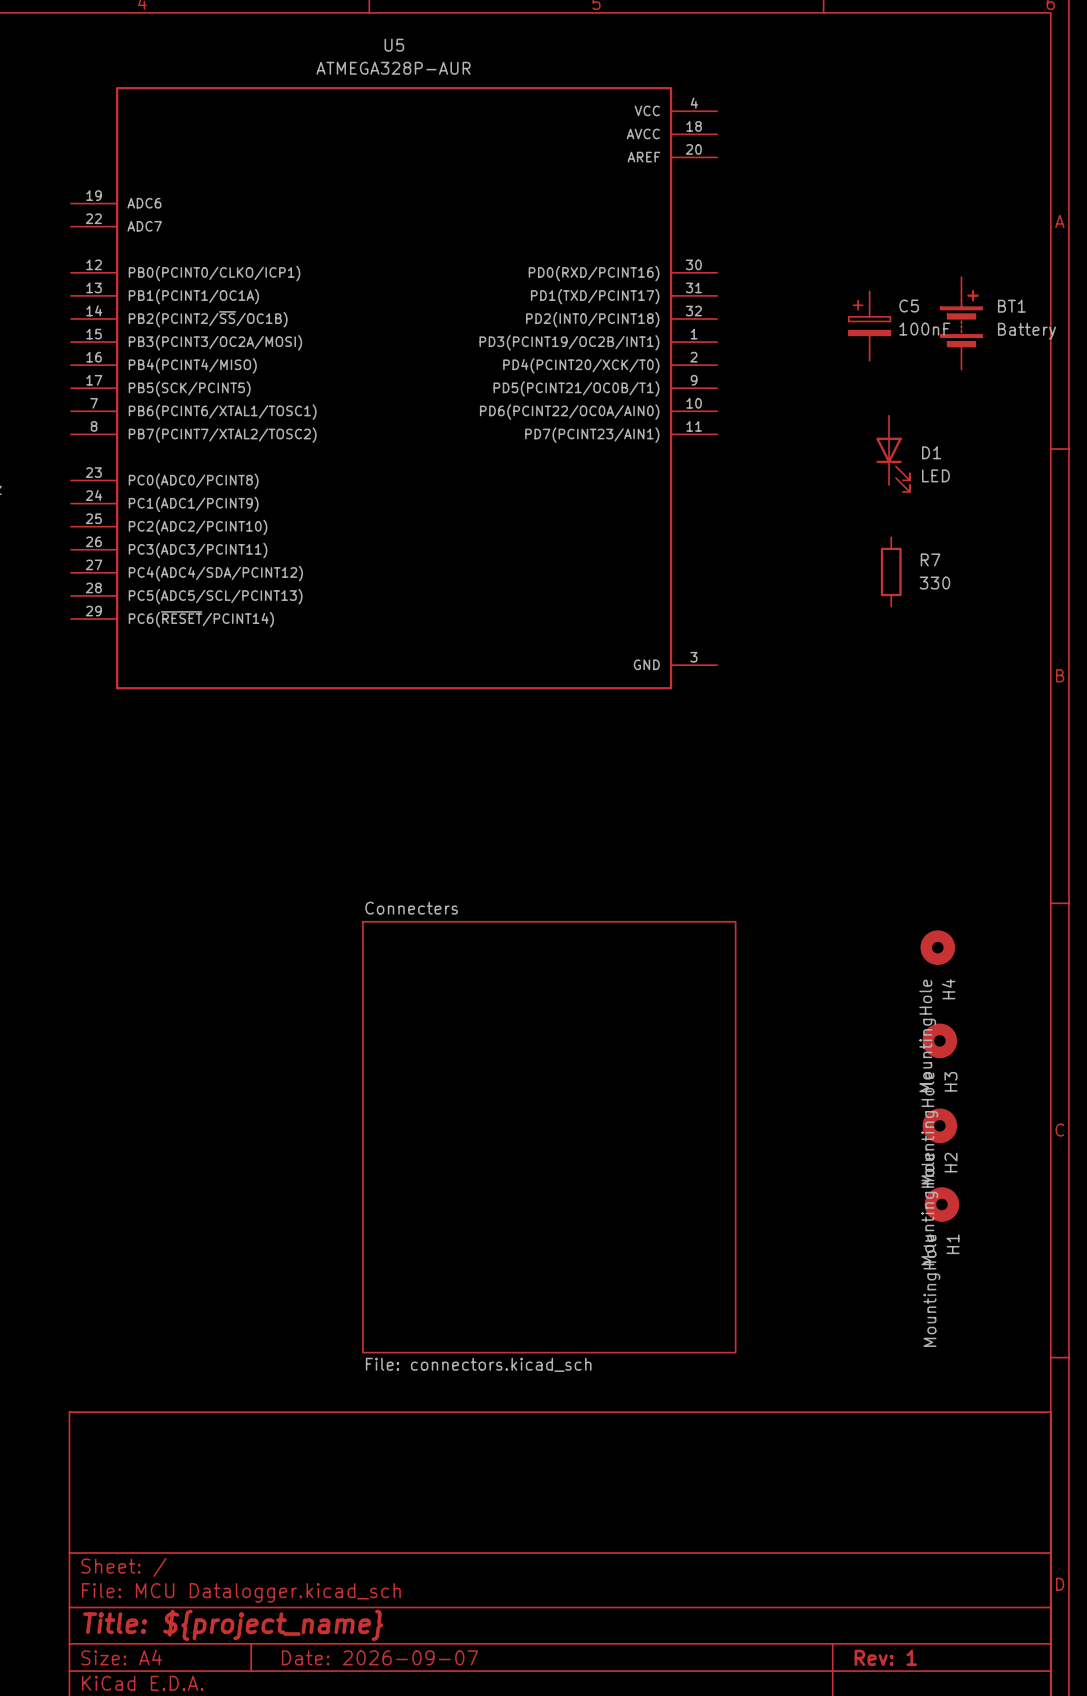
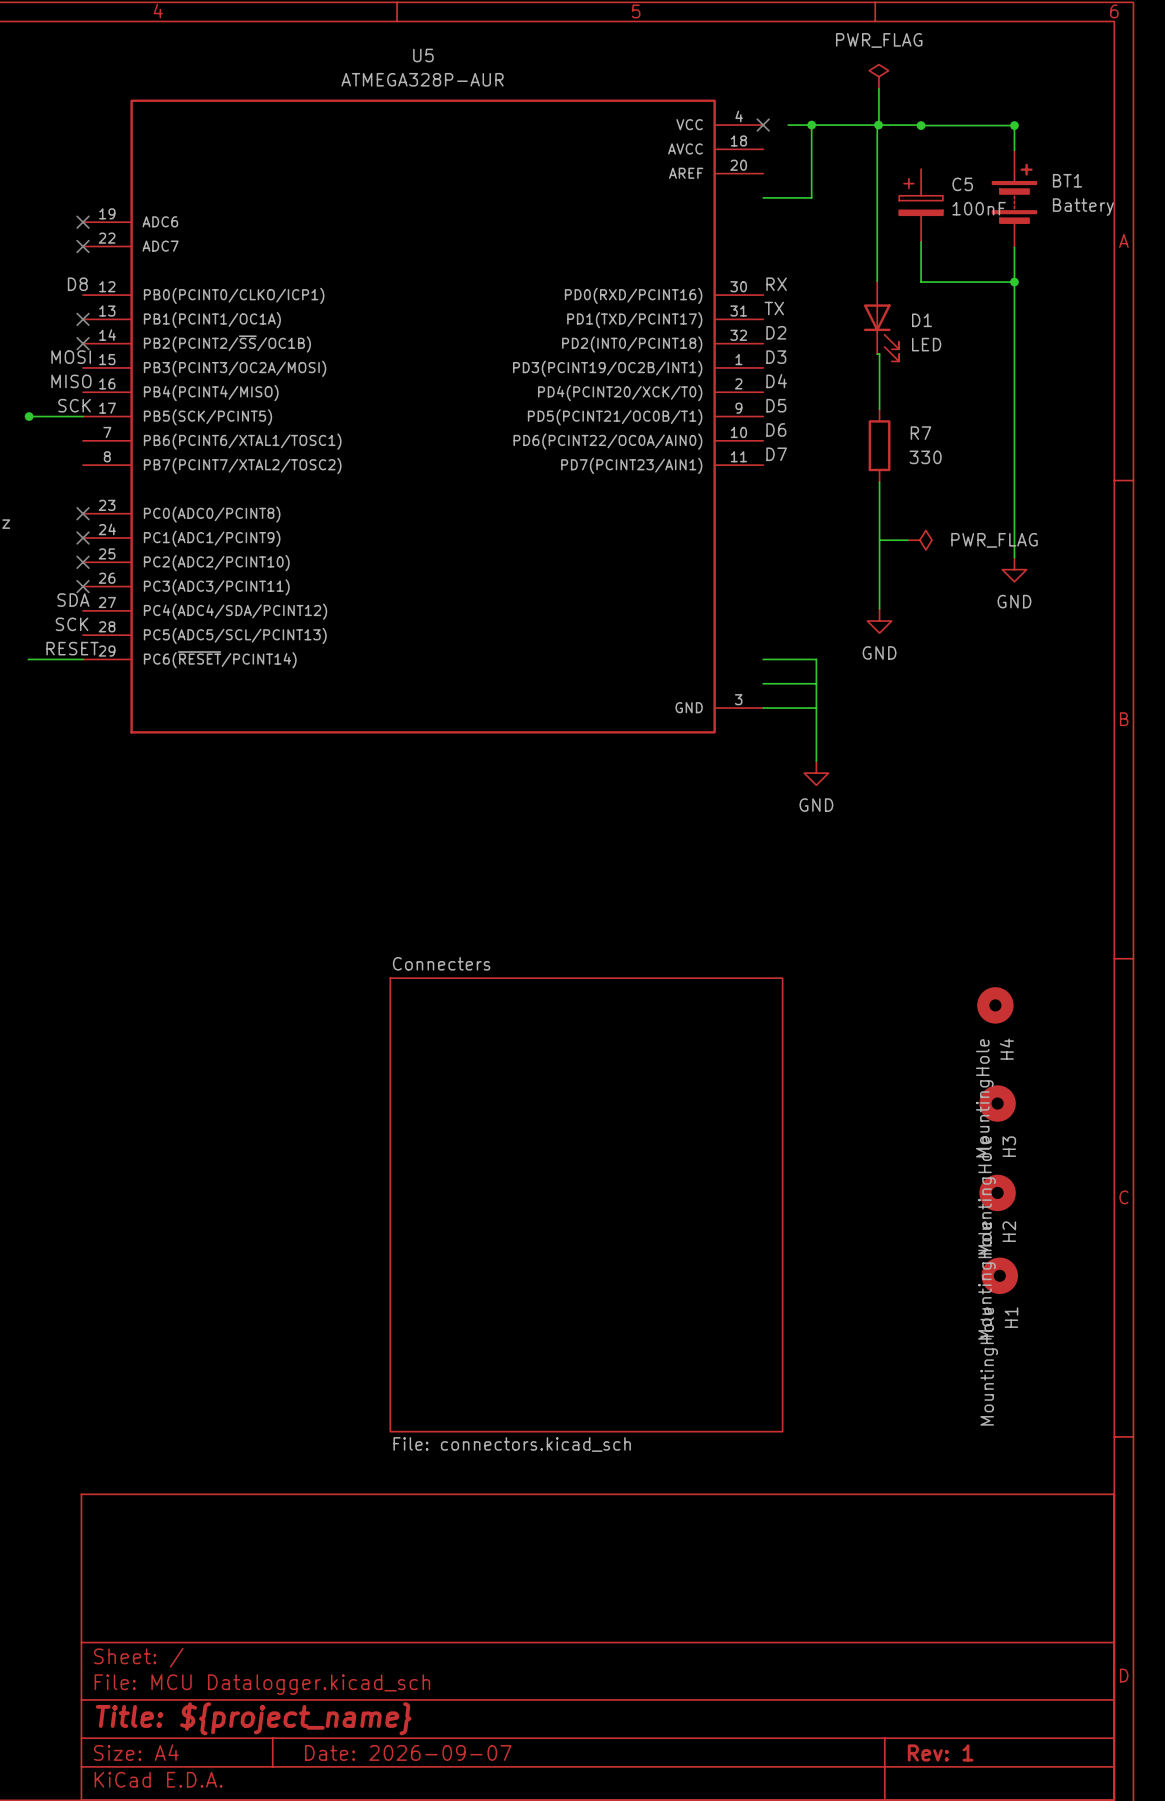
power symbol: none -> PWR_FLAG (878, 76)
wire: none -> (878, 88) (878, 125)
no-connect mark: none -> (763, 125)
wire: none -> (788, 125) (921, 125)
wire: none -> (811, 125) (811, 197) (763, 197)
junction: none -> (811, 125)
wire: none -> (877, 125) (877, 281)
junction: none -> (878, 125)
wire: none -> (921, 125) (1014, 125)
junction: none -> (921, 125)
wire: none -> (1014, 125) (1014, 150)
junction: none -> (1014, 125)
no-connect mark: none -> (83, 222)
wire: none -> (921, 241) (921, 282) (1014, 282)
no-connect mark: none -> (83, 246)
wire: none -> (1014, 247) (1014, 557)
junction: none -> (1014, 282)
label: none -> D8 (77, 284)
label: none -> RX (776, 284)
label: none -> TX (774, 308)
no-connect mark: none -> (83, 319)
label: none -> D2 (776, 332)
no-connect mark: none -> (83, 343)
BT1 position: (961, 323) -> (1014, 198)
C5 position: (869, 326) -> (921, 205)
wire: none -> (877, 354) (879, 354) (879, 409)
label: none -> MOSI (71, 357)
label: none -> D3 (776, 357)
label: none -> MISO (71, 381)
label: none -> D4 (776, 381)
label: none -> SCK (74, 405)
label: none -> D5 (776, 405)
wire: none -> (29, 416) (83, 416)
junction: none -> (29, 416)
label: none -> D6 (776, 429)
label: none -> D7 (776, 454)
wire: none -> (879, 482) (879, 608)
D1 position: (893, 453) -> (881, 321)
no-connect mark: none -> (83, 513)
no-connect mark: none -> (83, 538)
wire: none -> (879, 540) (907, 540)
power symbol: none -> PWR_FLAG (919, 540)
no-connect mark: none -> (83, 562)
power symbol: none -> GND (1014, 569)
no-connect mark: none -> (83, 586)
label: none -> SDA (73, 600)
R7 position: (891, 571) -> (879, 445)
power symbol: none -> GND (879, 621)
label: none -> SCK (72, 624)
label: none -> RESET (72, 648)
wire: none -> (28, 659) (83, 659)
wire: none -> (763, 659) (816, 659) (816, 760)
wire: none -> (763, 683) (816, 683)
wire: none -> (763, 708) (816, 708)
power symbol: none -> GND (816, 773)

